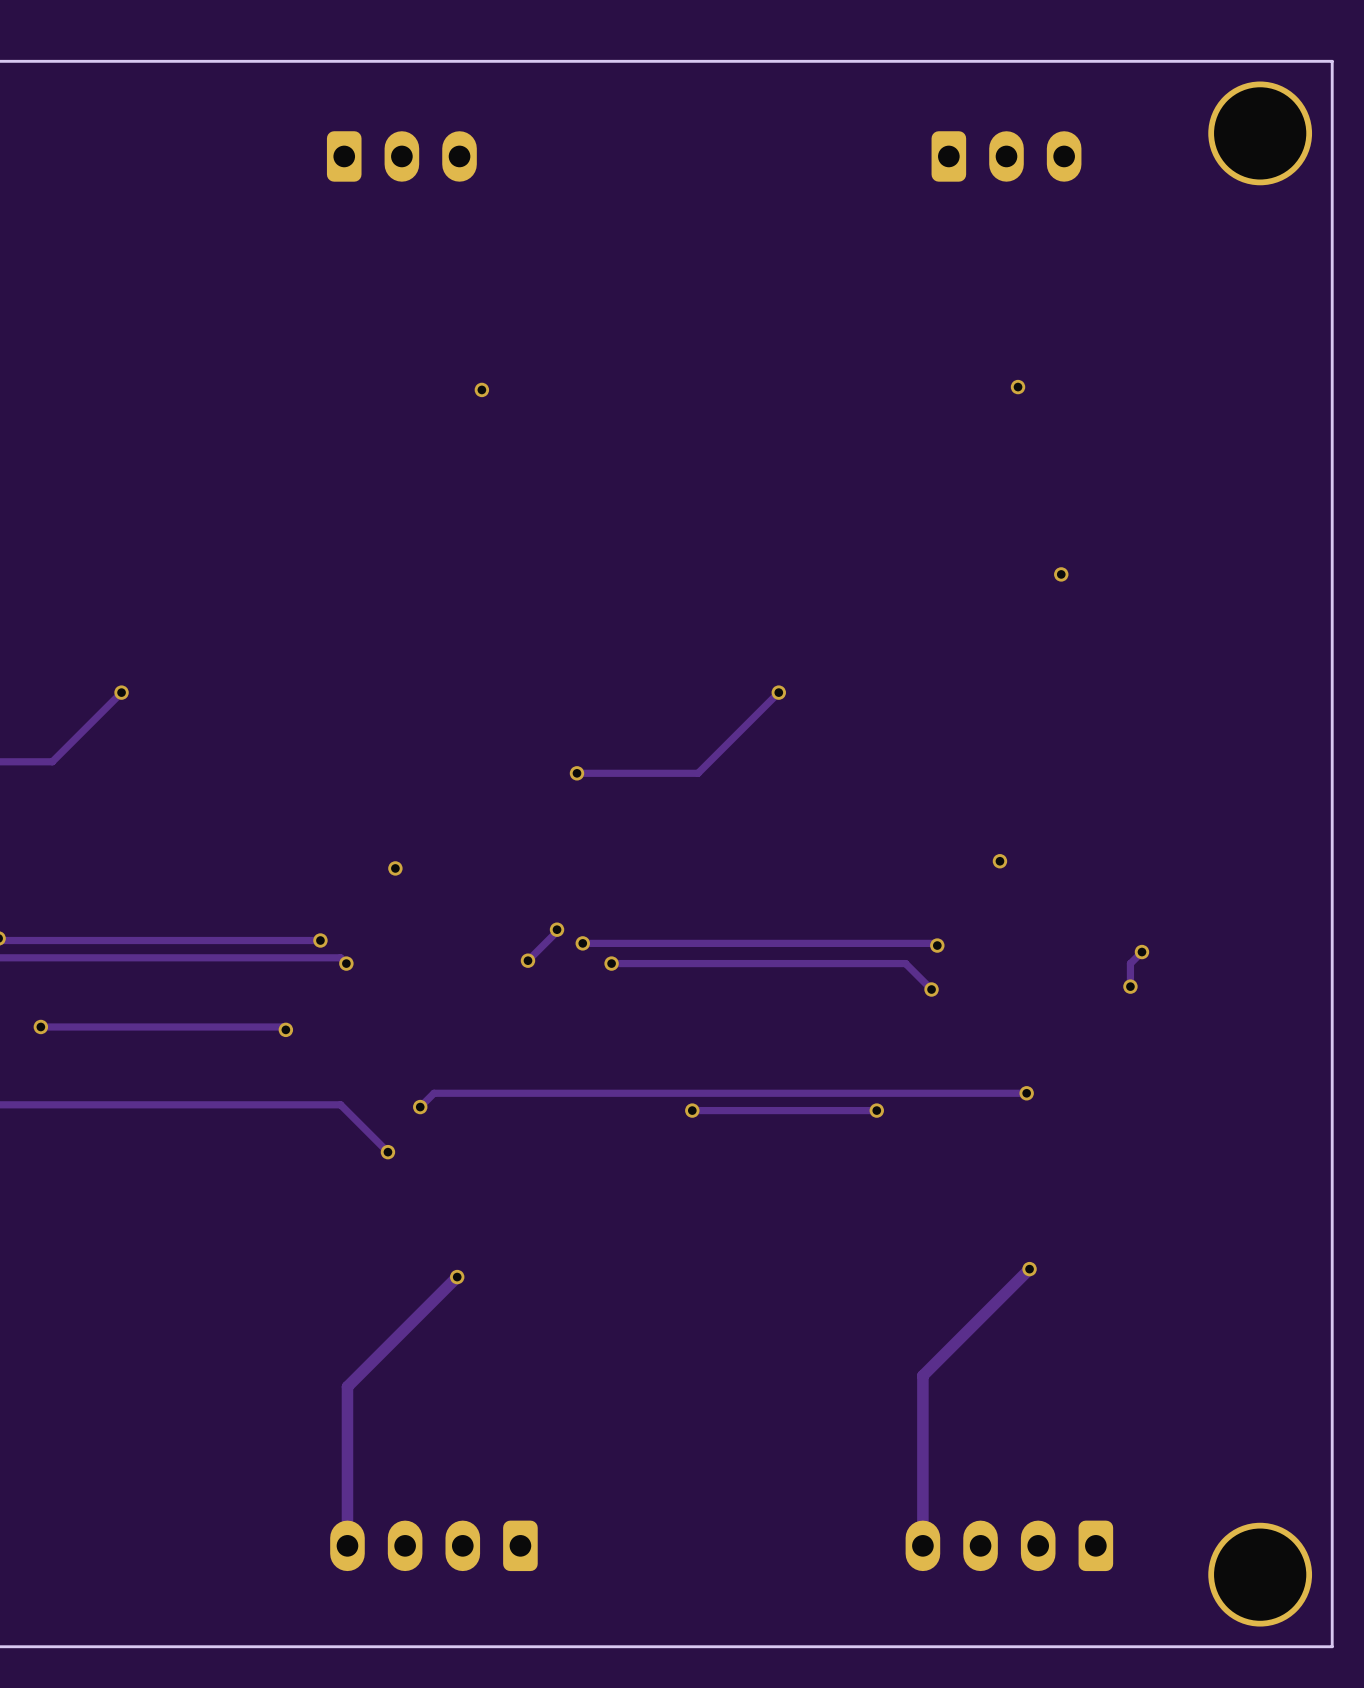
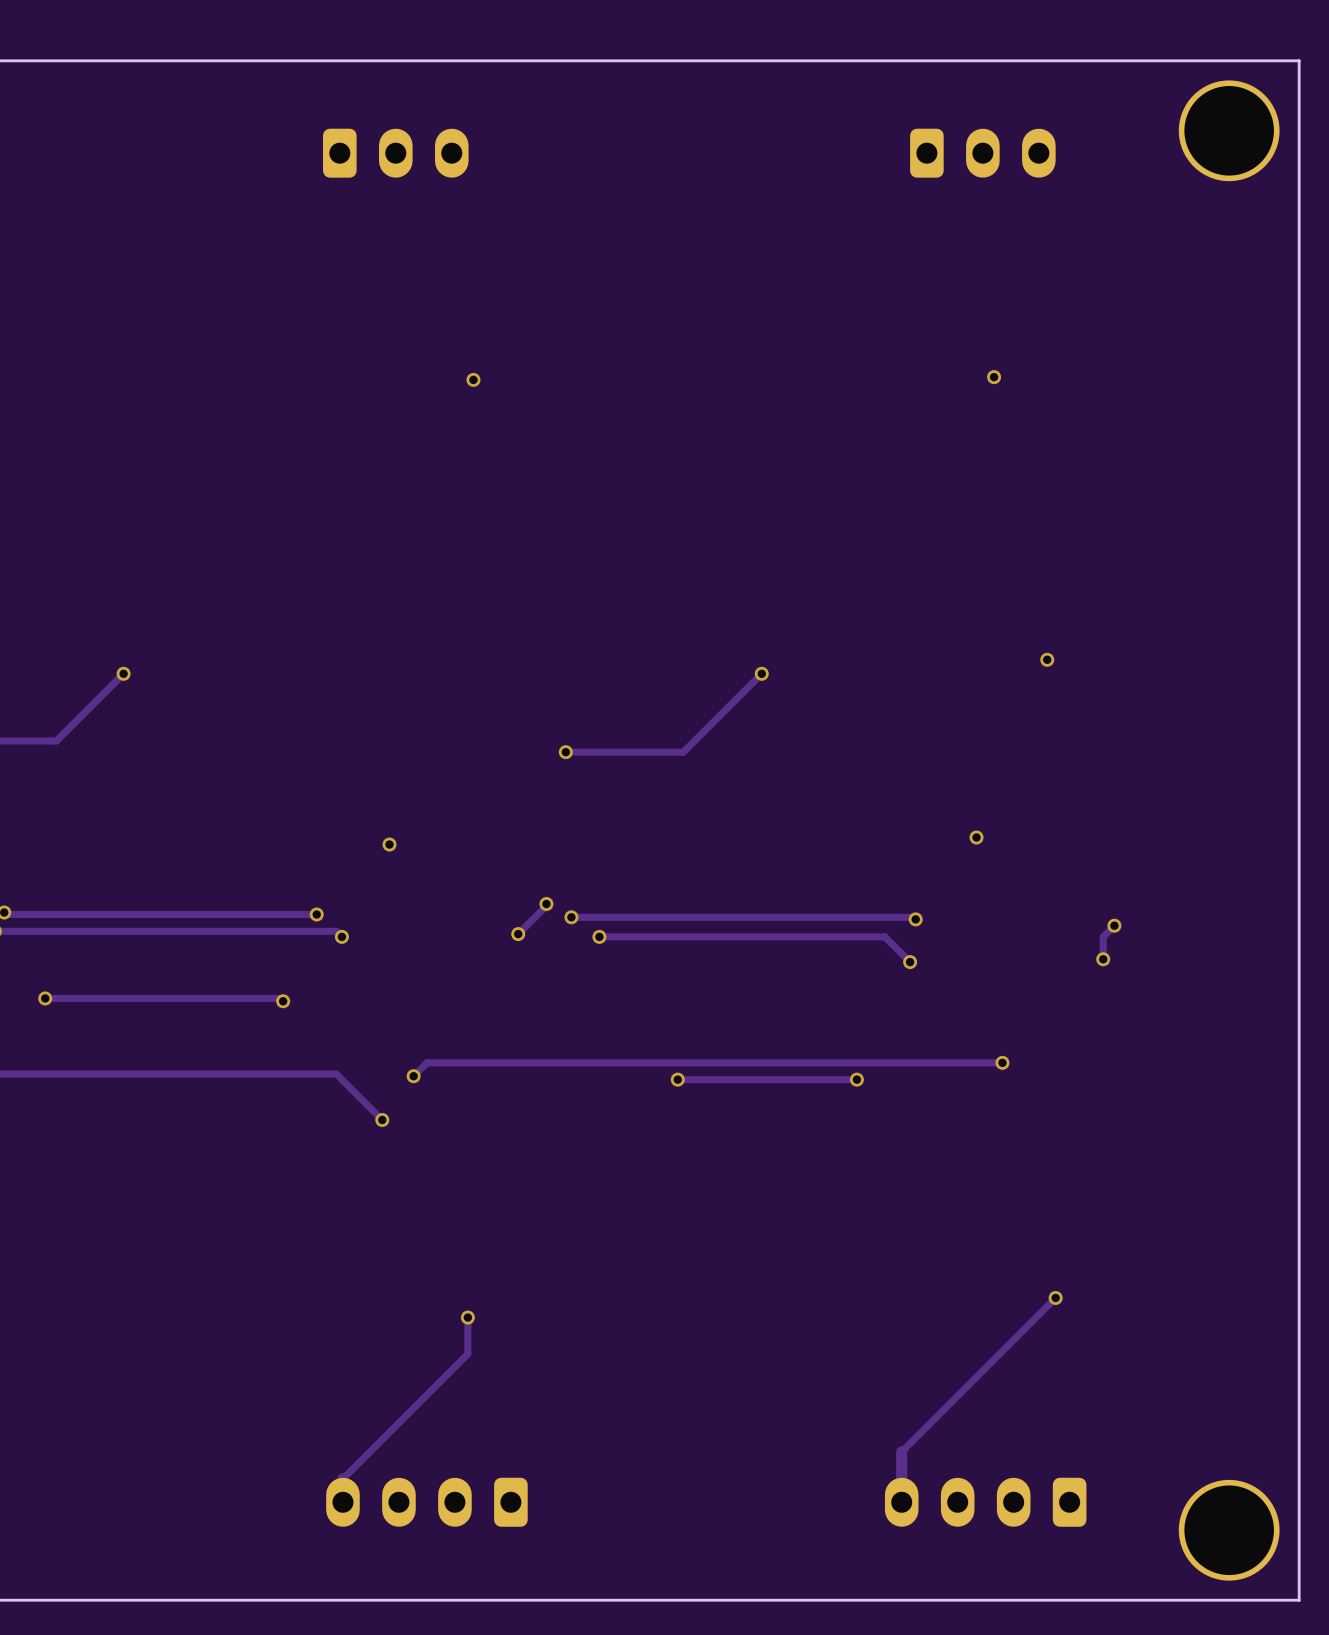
via position: (1061, 574) -> (1047, 659)
track: (1029, 1269) (922, 1375) (922, 1493) -> (1055, 1297) (901, 1451)
via position: (1029, 1269) -> (1055, 1297)
track: (457, 1277) (347, 1386) (347, 1521) -> (467, 1317) (467, 1353) (342, 1478)
via position: (457, 1277) -> (467, 1317)

